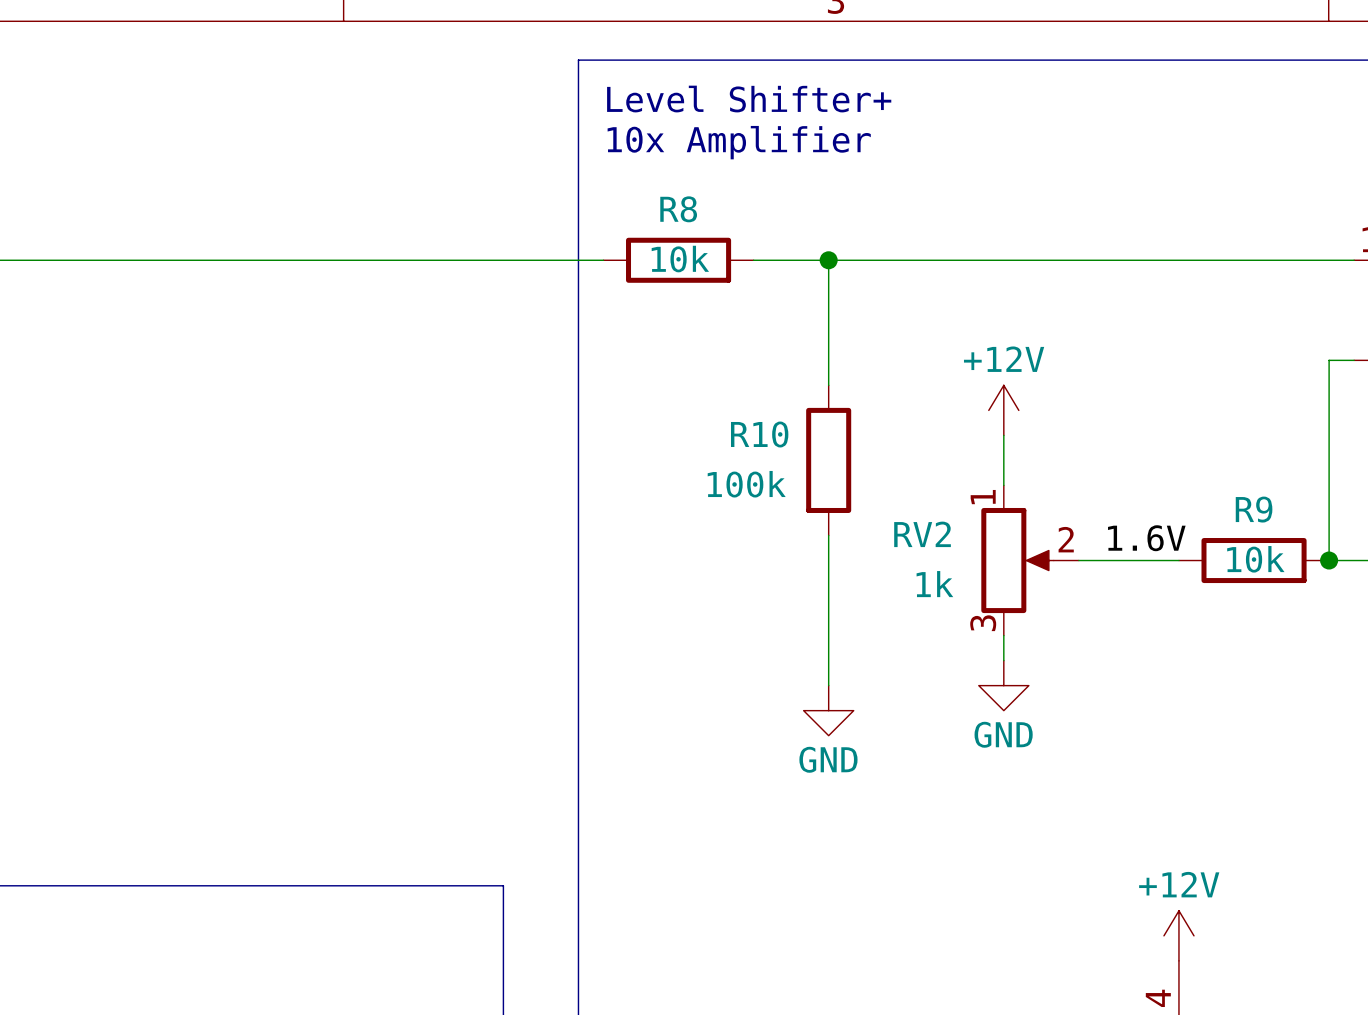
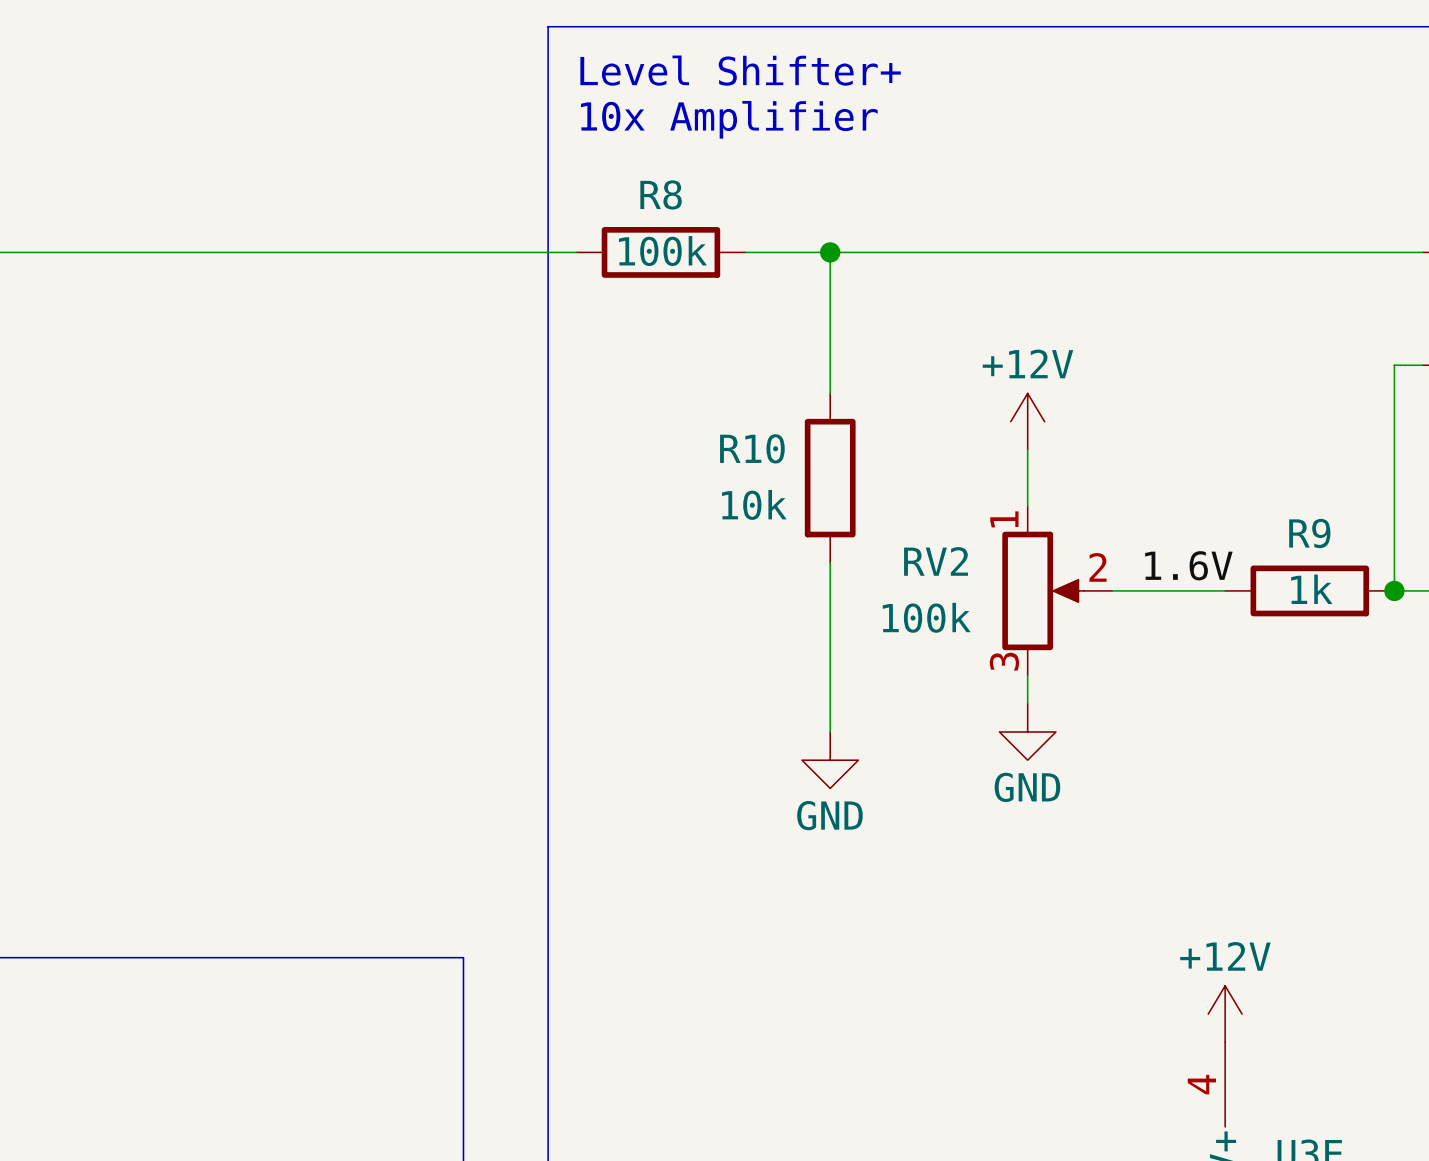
R8 value: 10k (680, 259) -> 100k (662, 251)
R10 value: 100k (746, 484) -> 10k (754, 504)
R9 value: 10k (1255, 559) -> 1k (1311, 589)
RV2 value: 1k (934, 584) -> 100k (926, 617)

